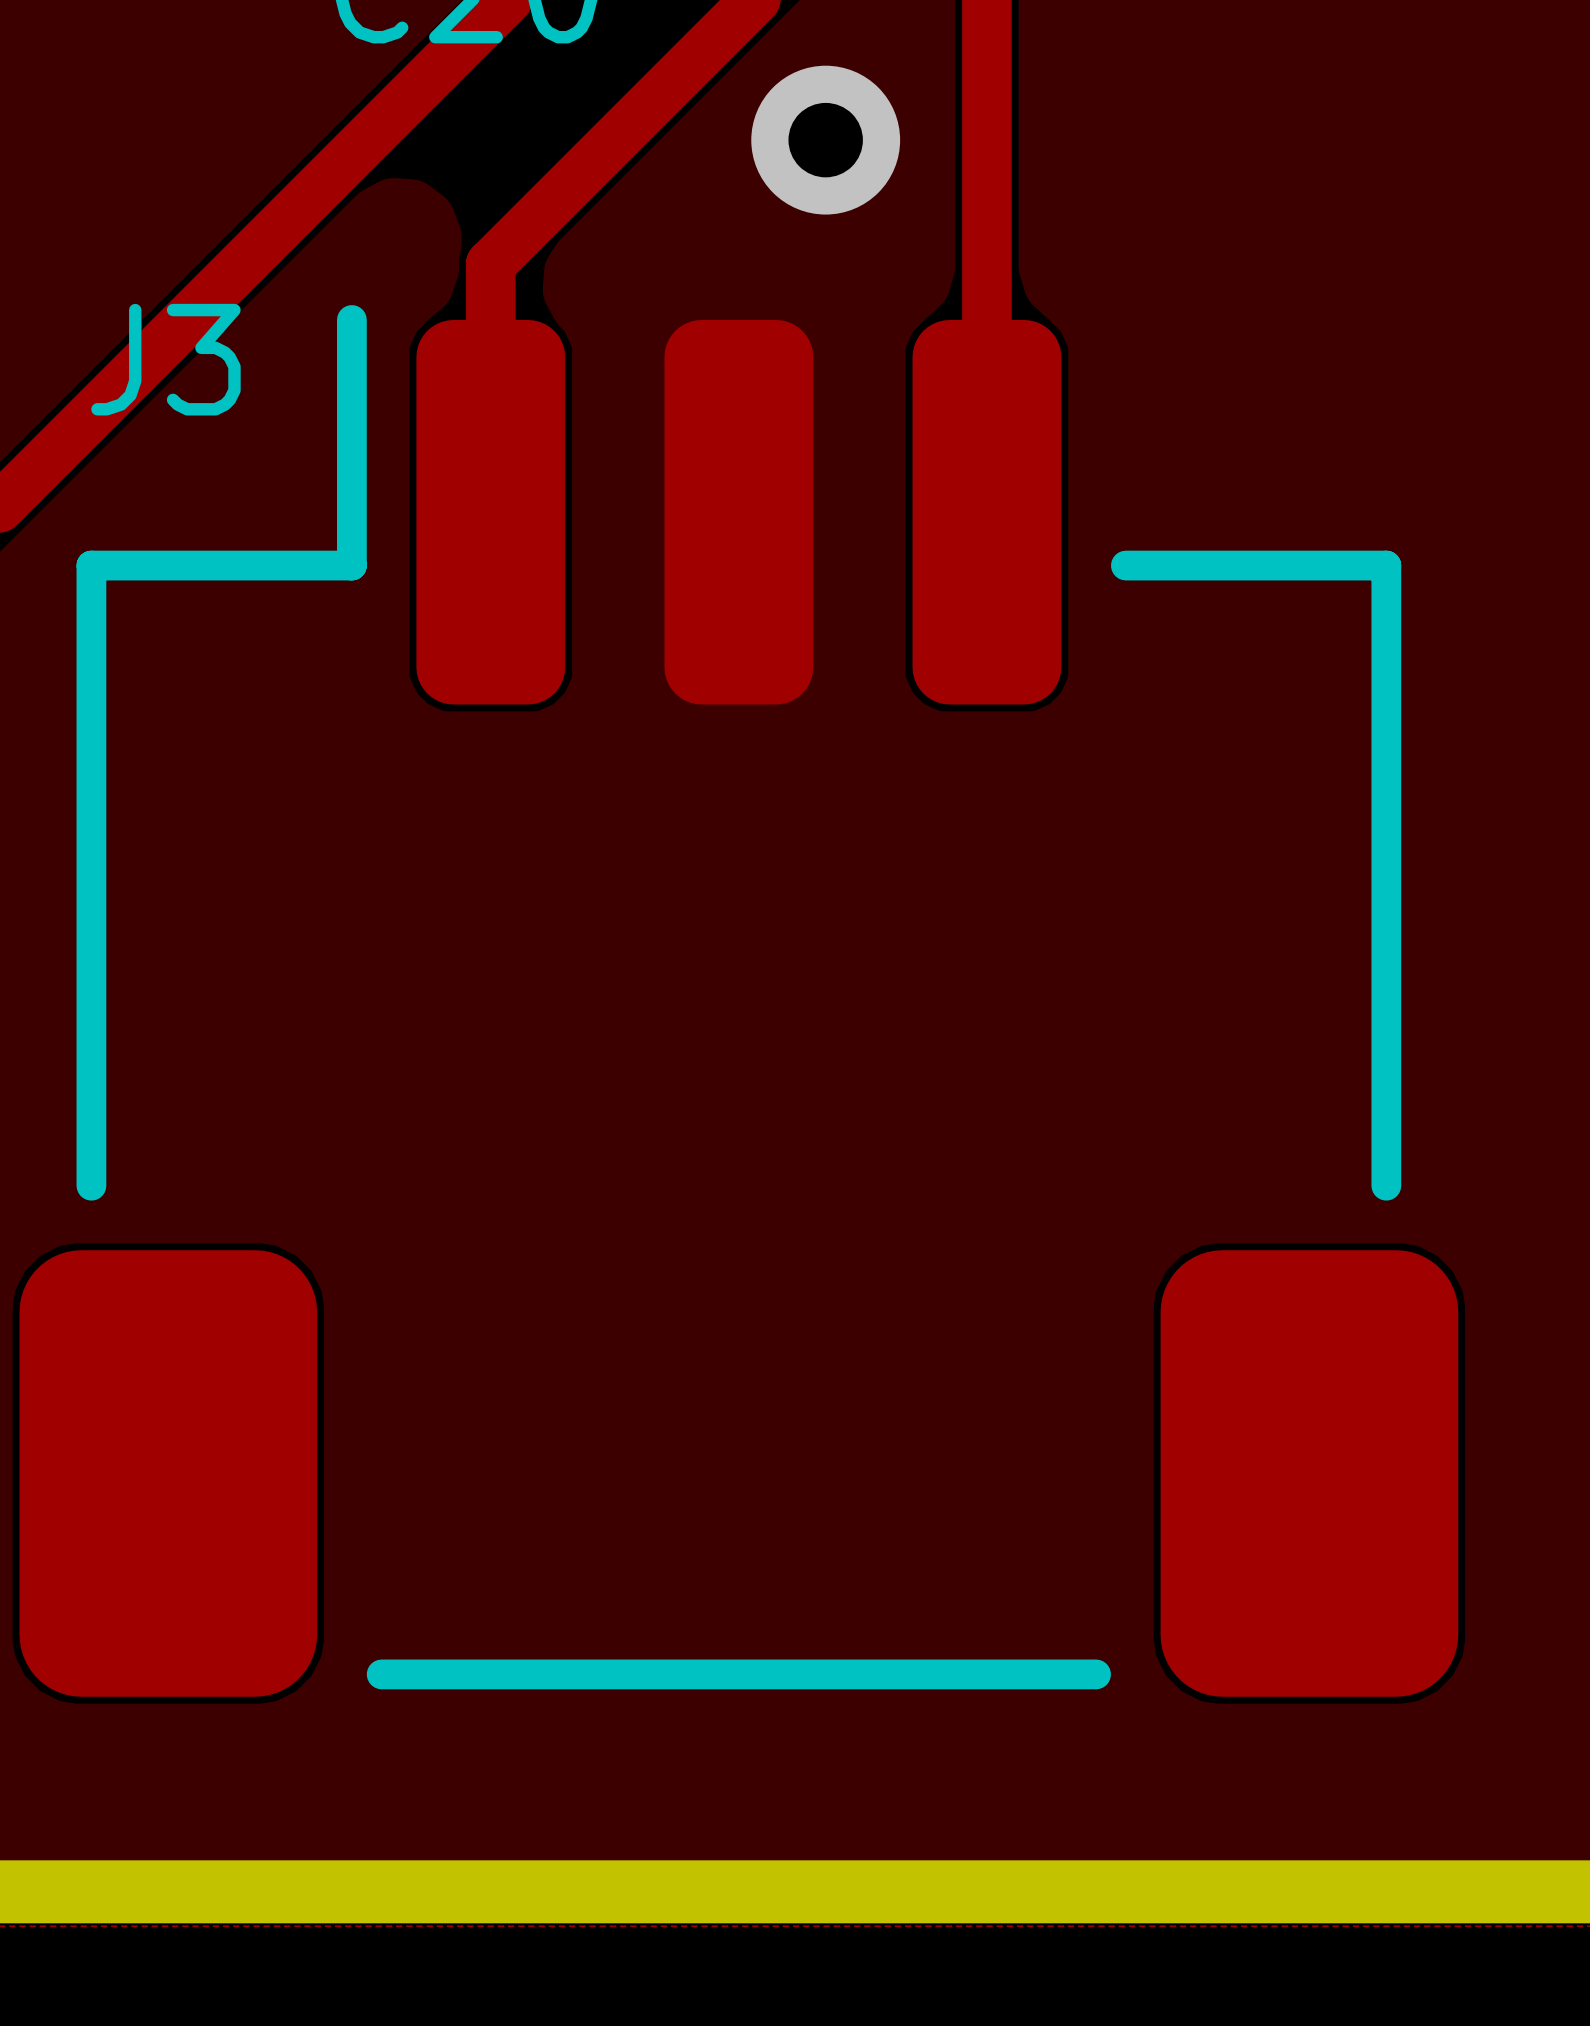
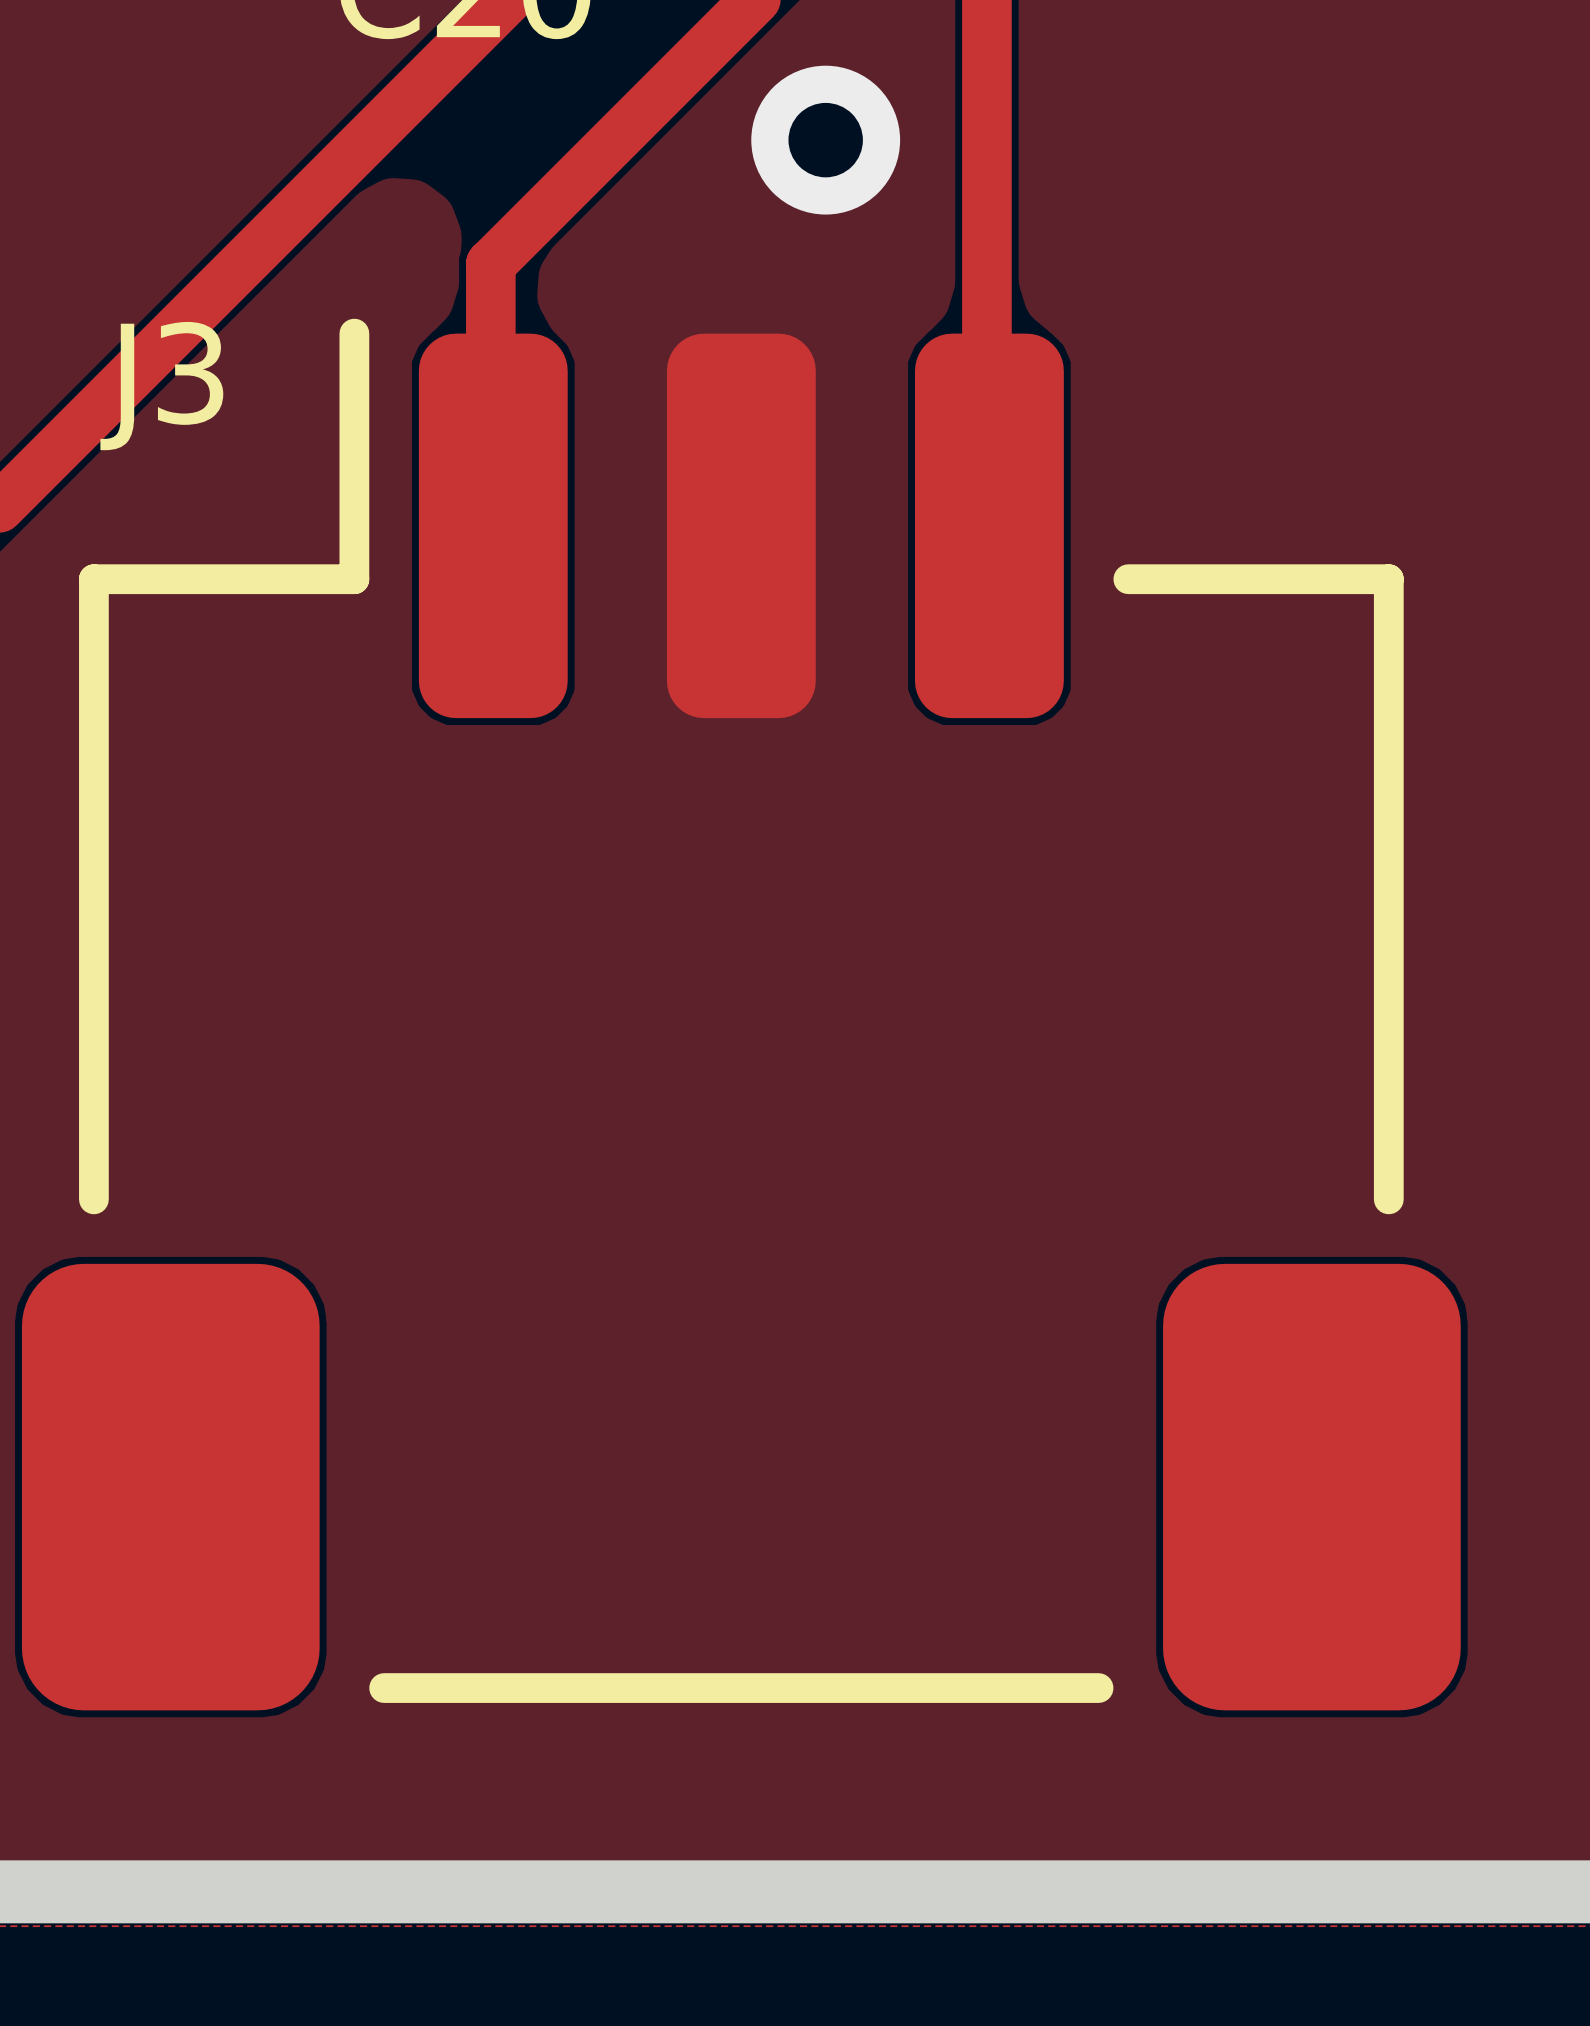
J3 position: (738, 1000) -> (741, 1014)

